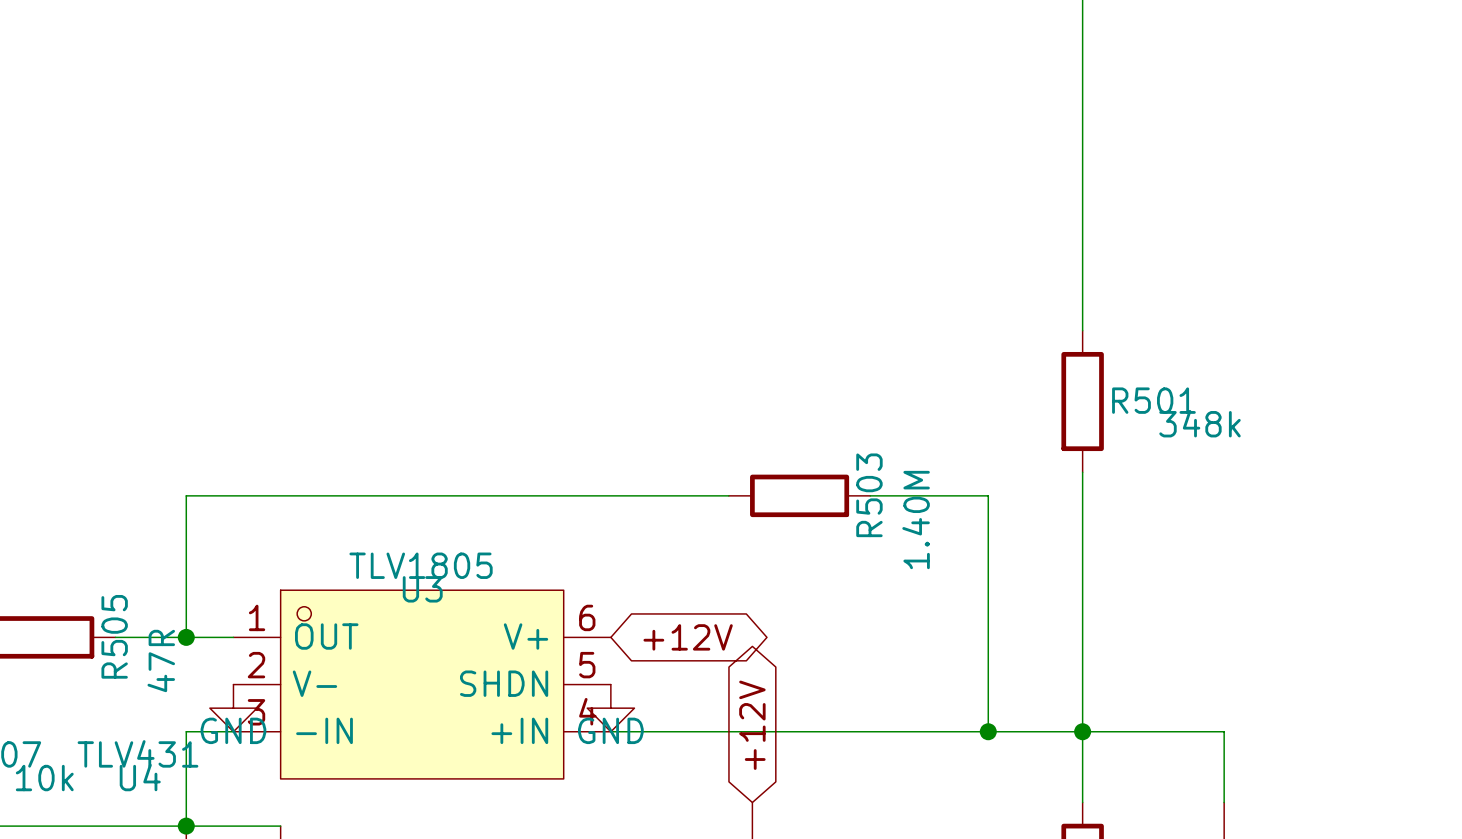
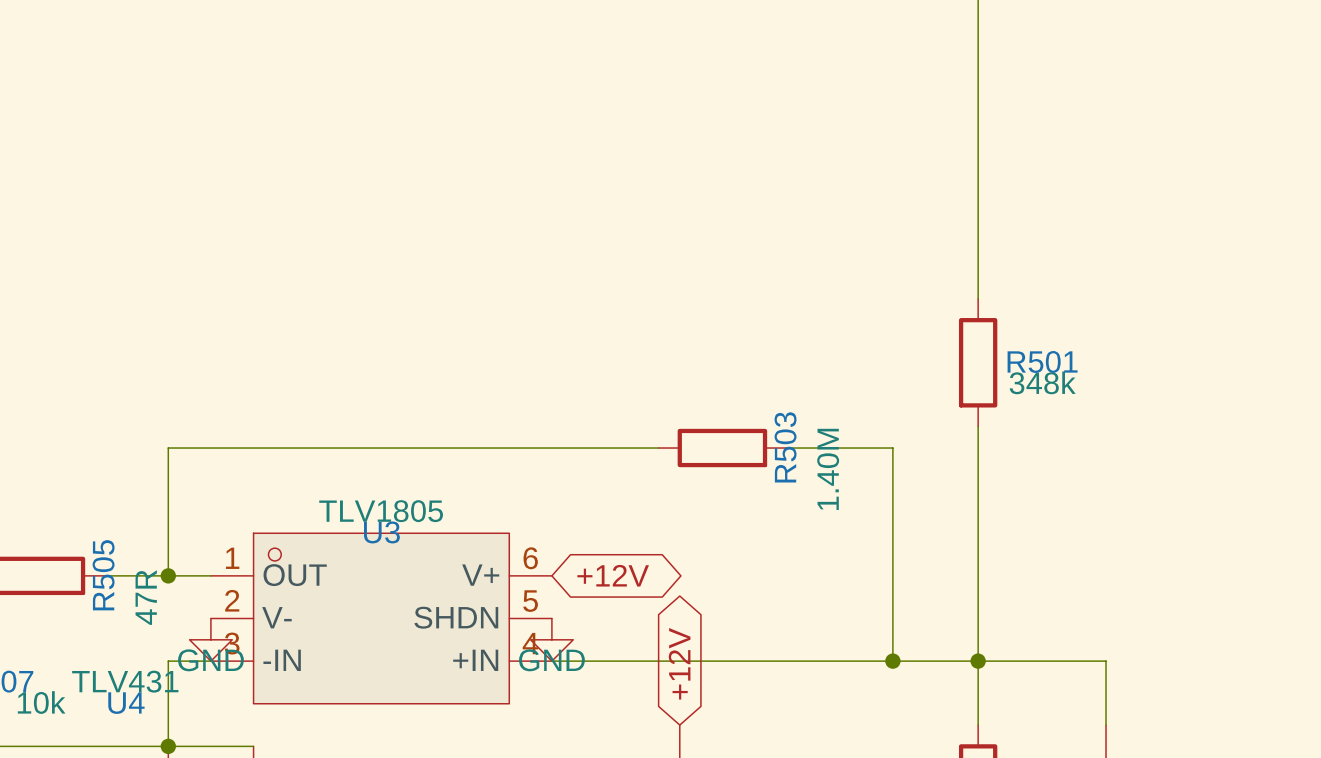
R501 value position: 348k (1200, 423) -> 348k (1042, 382)

